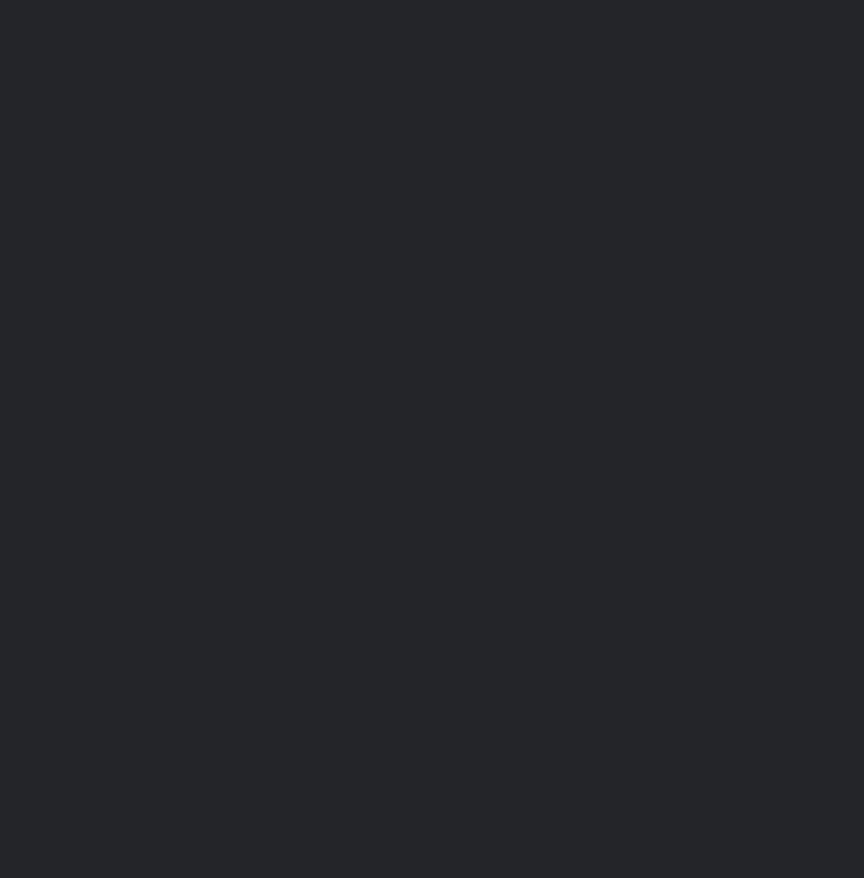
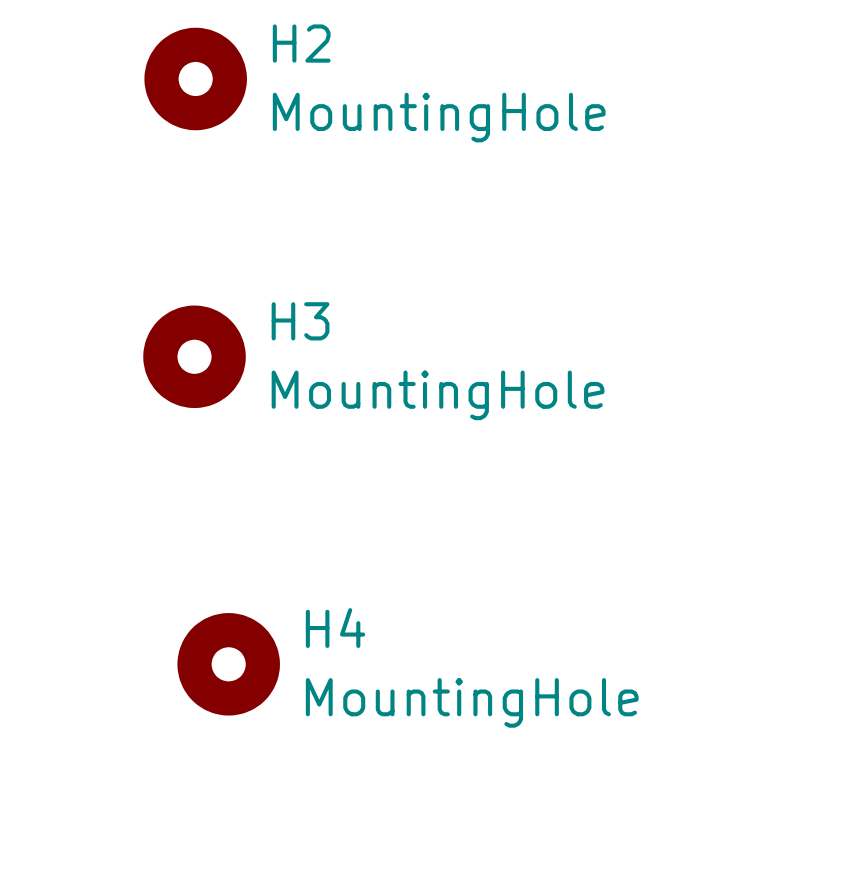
H2: none -> MountingHole (195, 78)
H3: none -> MountingHole (194, 356)
H4: none -> MountingHole (228, 664)

